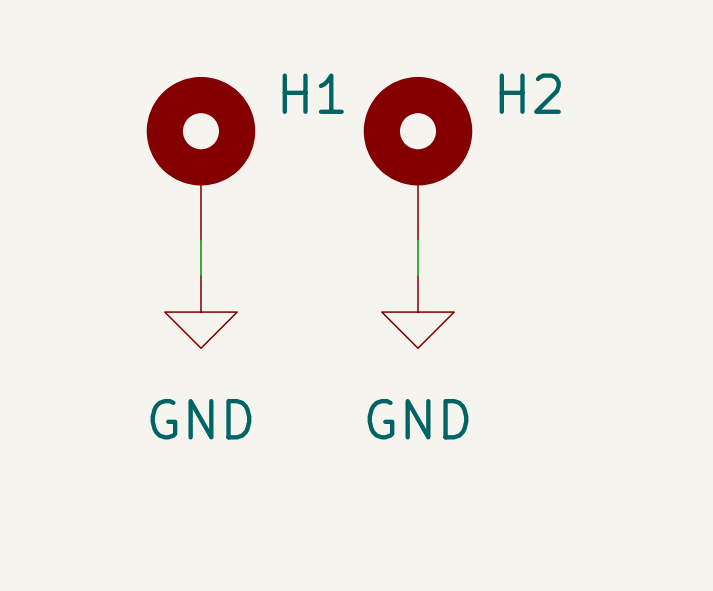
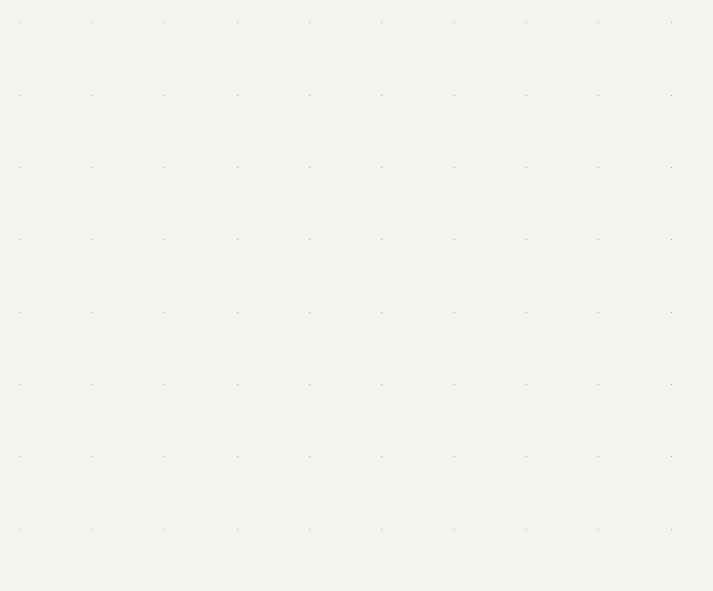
H1: (200, 158) -> none
H2: (418, 158) -> none
wire: (200, 239) (200, 275) -> none
wire: (418, 239) (418, 275) -> none
power symbol: GND (200, 312) -> none
power symbol: GND (418, 312) -> none

